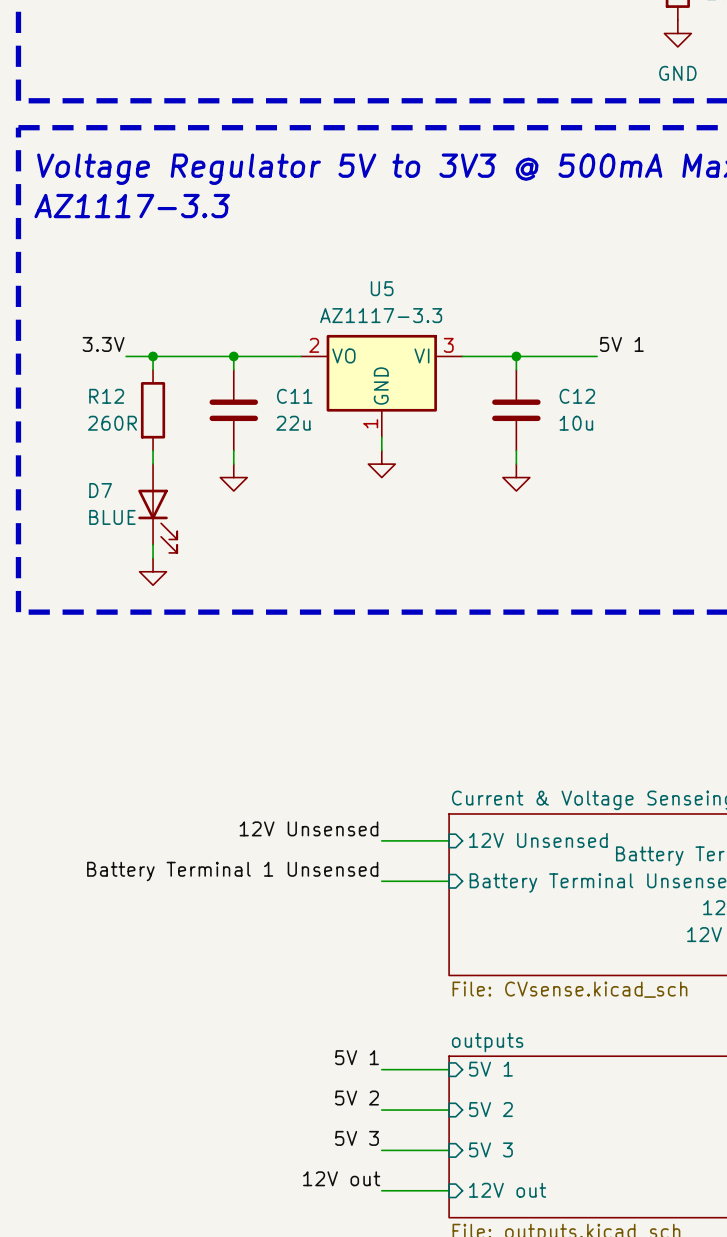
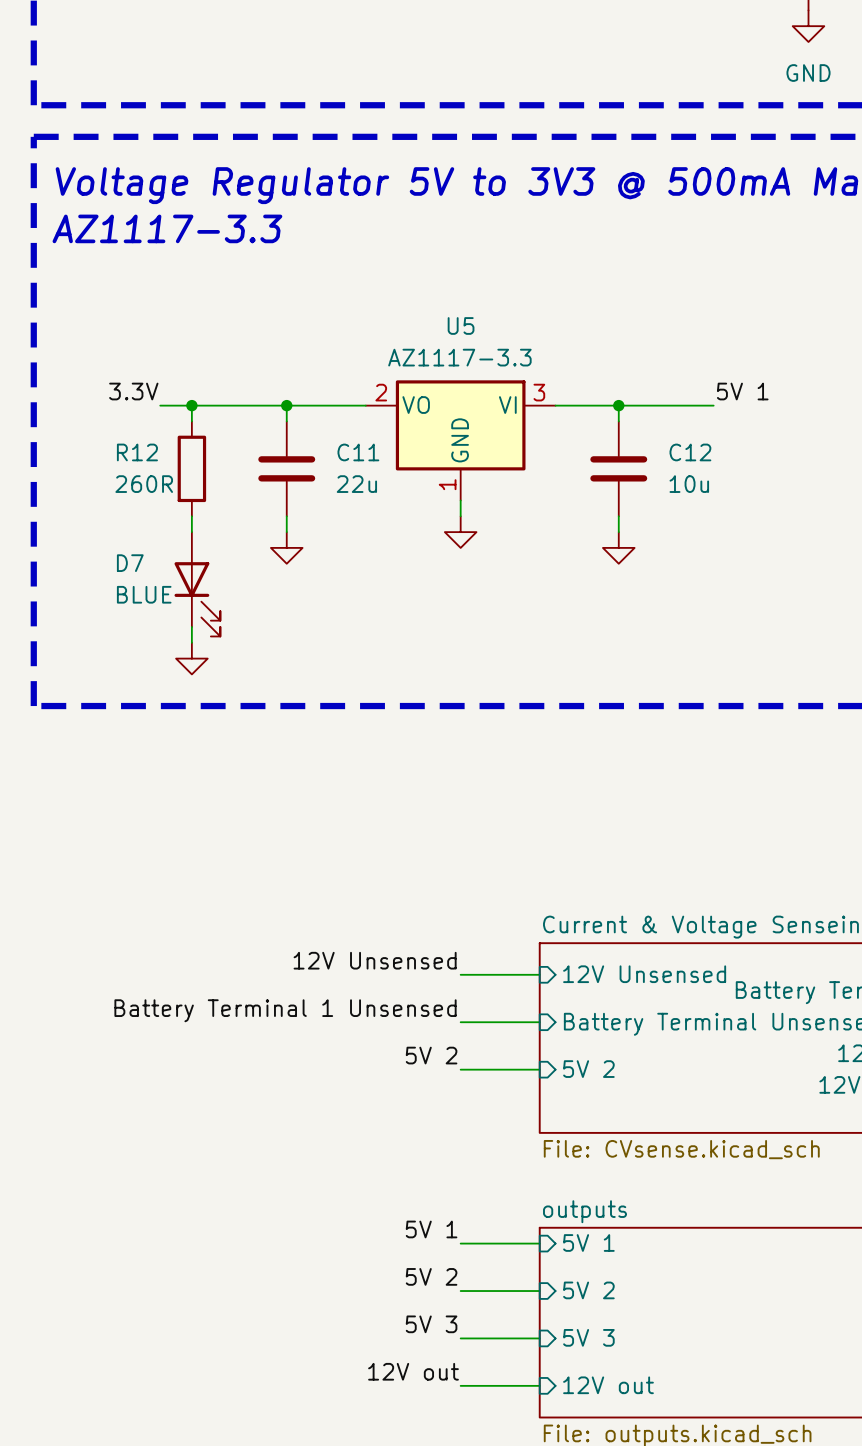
label: none -> 5V 2 (431, 1055)
wire: none -> (460, 1069) (539, 1069)
sheet pin: none -> 5V 2 (588, 1069)

